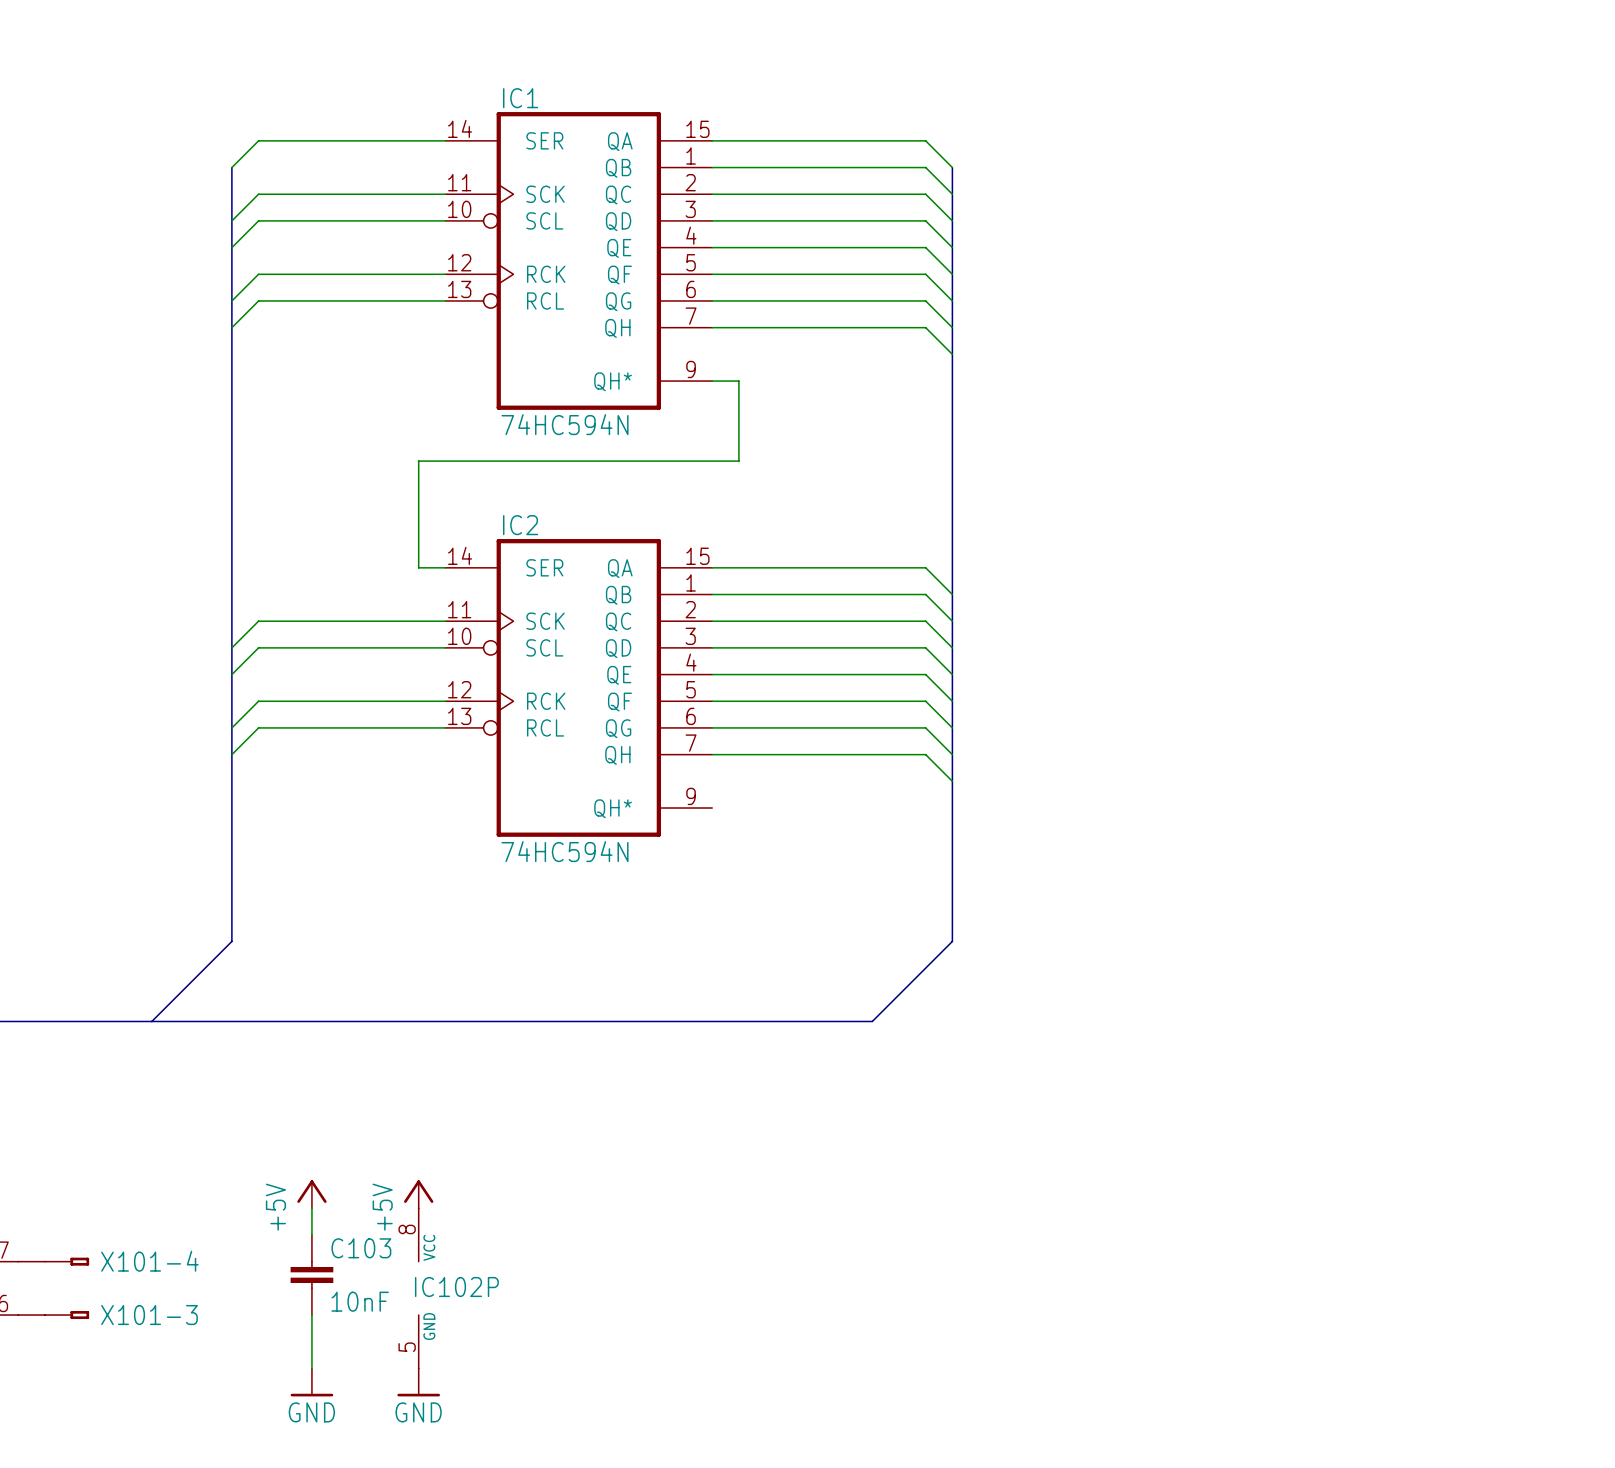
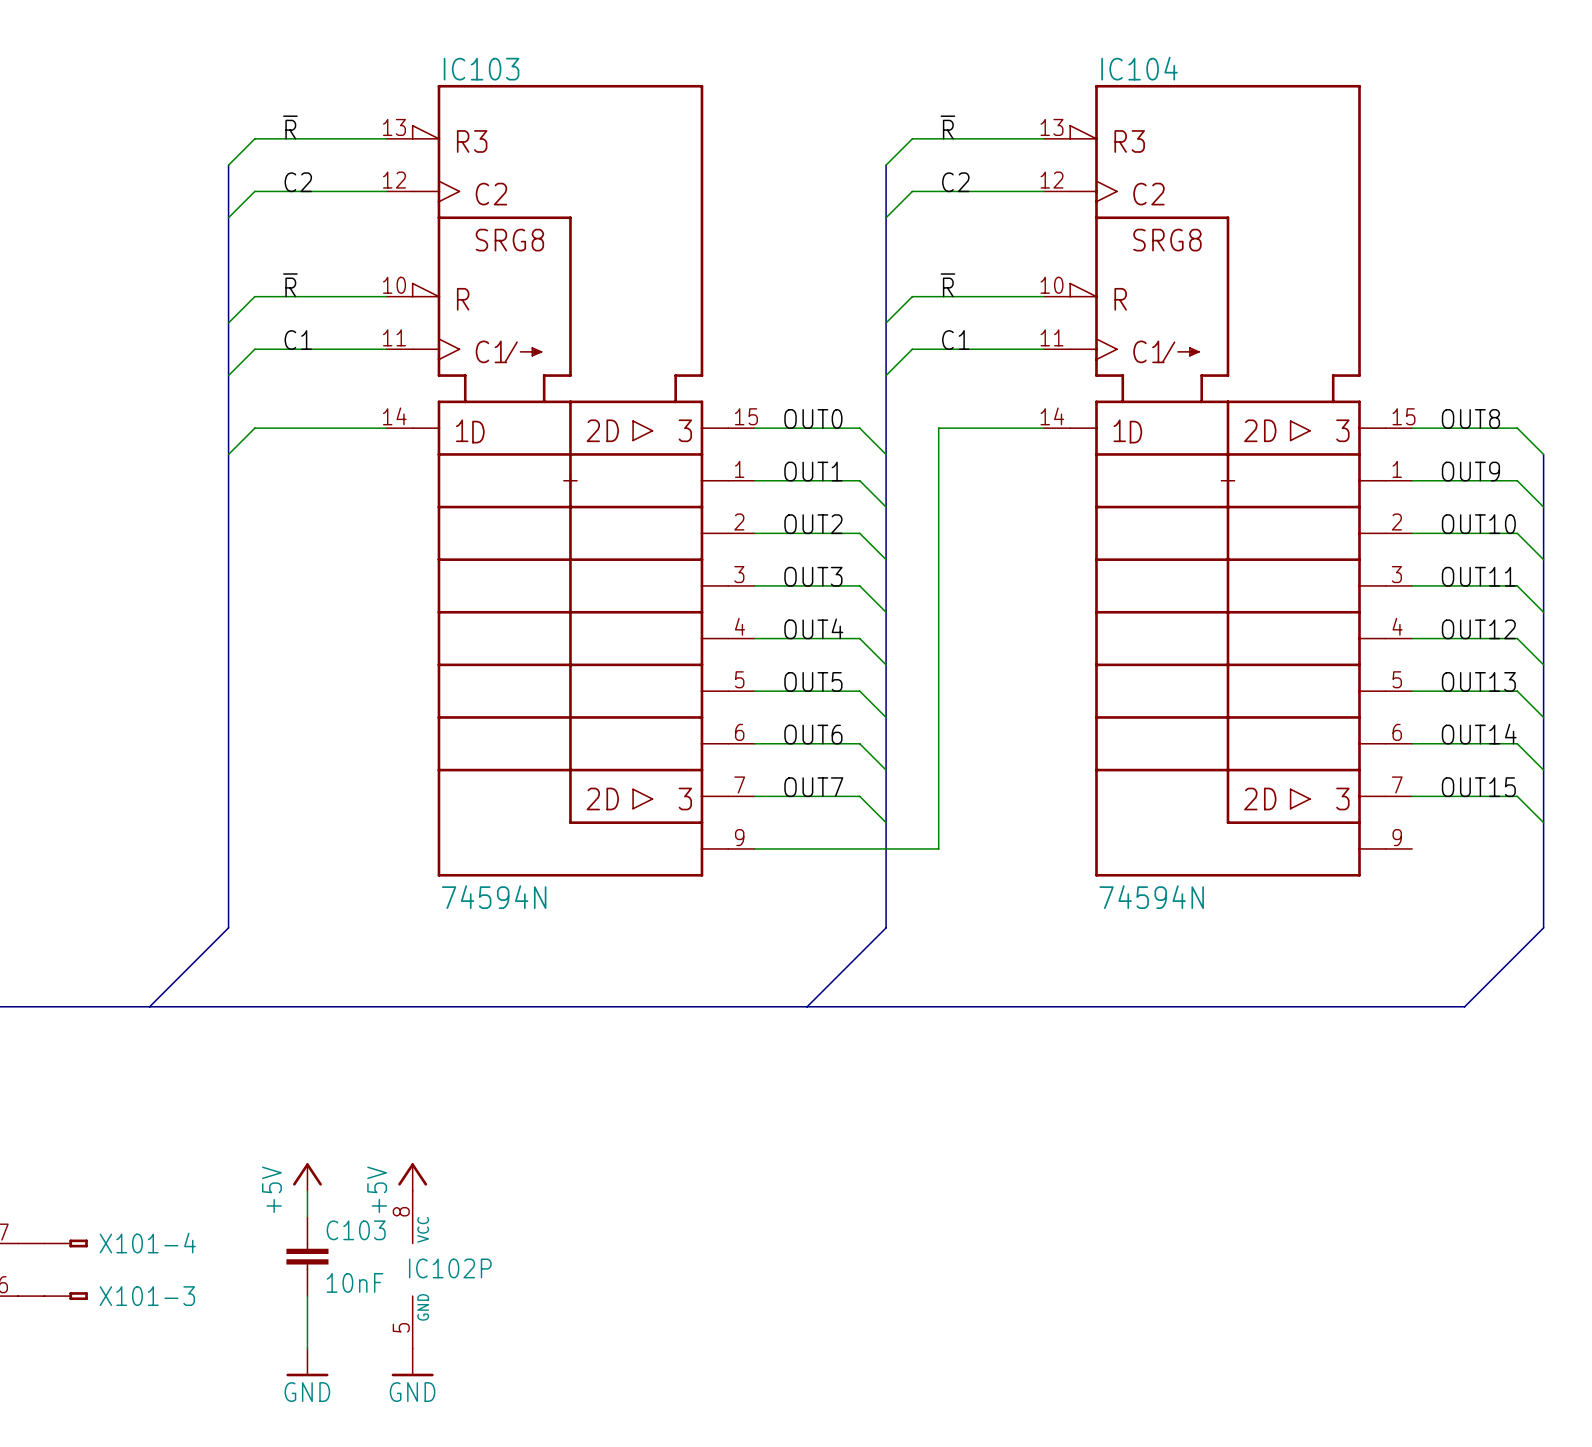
label: none -> ~{R} (290, 127)
label: none -> ~{R} (947, 127)
wire: (712, 140) (925, 140) (952, 167) -> none
wire: none -> (1043, 138) (912, 138) (886, 165)
wire: (712, 167) (925, 167) (952, 194) -> none
bus: none -> (886, 165) (886, 927) (807, 1006)
bus: (952, 167) (952, 941) (872, 1021) -> (1543, 454) (1543, 927) (1464, 1006) (859, 1006)
label: none -> C2 (298, 182)
label: none -> C2 (955, 182)
wire: (712, 194) (925, 194) (952, 220) -> none
wire: none -> (1043, 191) (912, 191) (886, 217)
wire: (445, 220) (258, 220) (231, 247) -> none
wire: (712, 220) (925, 220) (952, 247) -> none
wire: (712, 247) (925, 247) (952, 274) -> none
IC1: 74HC594N (578, 260) -> none
wire: (445, 274) (258, 274) (231, 300) -> none
wire: (712, 274) (925, 274) (952, 300) -> none
label: none -> ~{R} (290, 285)
label: none -> ~{R} (947, 285)
wire: (712, 300) (925, 300) (952, 327) -> none
wire: none -> (1043, 296) (912, 296) (886, 322)
wire: (712, 327) (925, 327) (952, 354) -> none
label: none -> C1 (298, 340)
label: none -> C1 (955, 340)
wire: none -> (386, 349) (254, 349) (228, 375)
wire: none -> (1043, 349) (912, 349) (886, 375)
wire: (712, 381) (738, 381) (738, 461) (418, 461) (418, 567) (445, 567) -> none
label: none -> OUT0 (813, 418)
label: none -> OUT8 (1470, 418)
wire: none -> (386, 428) (254, 428) (228, 454)
wire: none -> (754, 428) (859, 428) (886, 454)
wire: none -> (1043, 428) (938, 428) (938, 848) (754, 848)
wire: none -> (1412, 428) (1517, 428) (1543, 454)
label: none -> OUT1 (813, 471)
label: none -> OUT9 (1470, 471)
IC103: none -> 74594N (570, 480)
wire: none -> (754, 480) (859, 480) (886, 507)
IC104: none -> 74594N (1227, 480)
wire: none -> (1412, 480) (1517, 480) (1543, 507)
label: none -> OUT2 (813, 524)
label: none -> OUT10 (1478, 524)
wire: none -> (754, 533) (859, 533) (886, 559)
wire: none -> (1412, 533) (1517, 533) (1543, 559)
wire: (712, 567) (925, 567) (952, 594) -> none
label: none -> OUT3 (813, 576)
label: none -> OUT11 (1478, 576)
wire: (872, 594) (925, 594) (952, 621) -> (859, 585) (886, 612)
wire: none -> (1412, 585) (1517, 585) (1543, 612)
wire: (445, 621) (258, 621) (231, 647) -> none
wire: (712, 621) (925, 621) (952, 647) -> none
label: none -> OUT4 (813, 628)
label: none -> OUT12 (1478, 629)
wire: (445, 647) (258, 647) (231, 674) -> none
wire: (872, 647) (925, 647) (952, 674) -> (859, 638) (886, 664)
wire: none -> (1412, 638) (1517, 638) (1543, 664)
wire: (712, 674) (925, 674) (952, 701) -> none
IC2: 74HC594N (578, 687) -> none
label: none -> OUT5 (813, 681)
label: none -> OUT13 (1478, 681)
wire: (445, 701) (258, 701) (231, 727) -> none
wire: (872, 701) (925, 701) (952, 727) -> (859, 691) (886, 717)
wire: none -> (1412, 691) (1517, 691) (1543, 717)
wire: (445, 727) (258, 727) (231, 754) -> none
wire: (712, 727) (925, 727) (952, 754) -> none
label: none -> OUT14 (1479, 734)
label: none -> OUT6 (813, 734)
wire: (872, 754) (925, 754) (952, 781) -> (859, 743) (886, 770)
wire: none -> (1412, 743) (1517, 743) (1543, 770)
label: none -> OUT7 (813, 787)
label: none -> OUT15 (1478, 787)
wire: none -> (754, 796) (859, 796) (886, 822)
wire: none -> (1412, 796) (1517, 796) (1543, 822)

